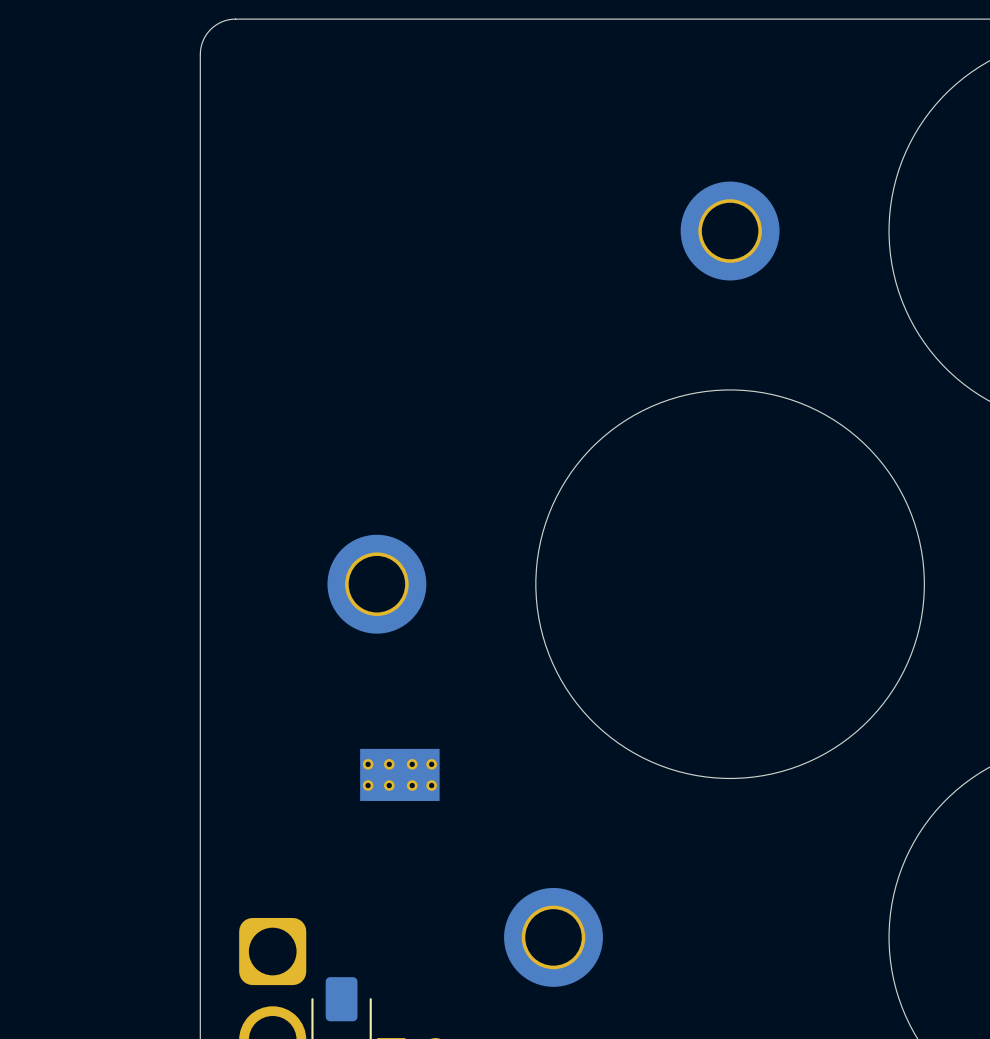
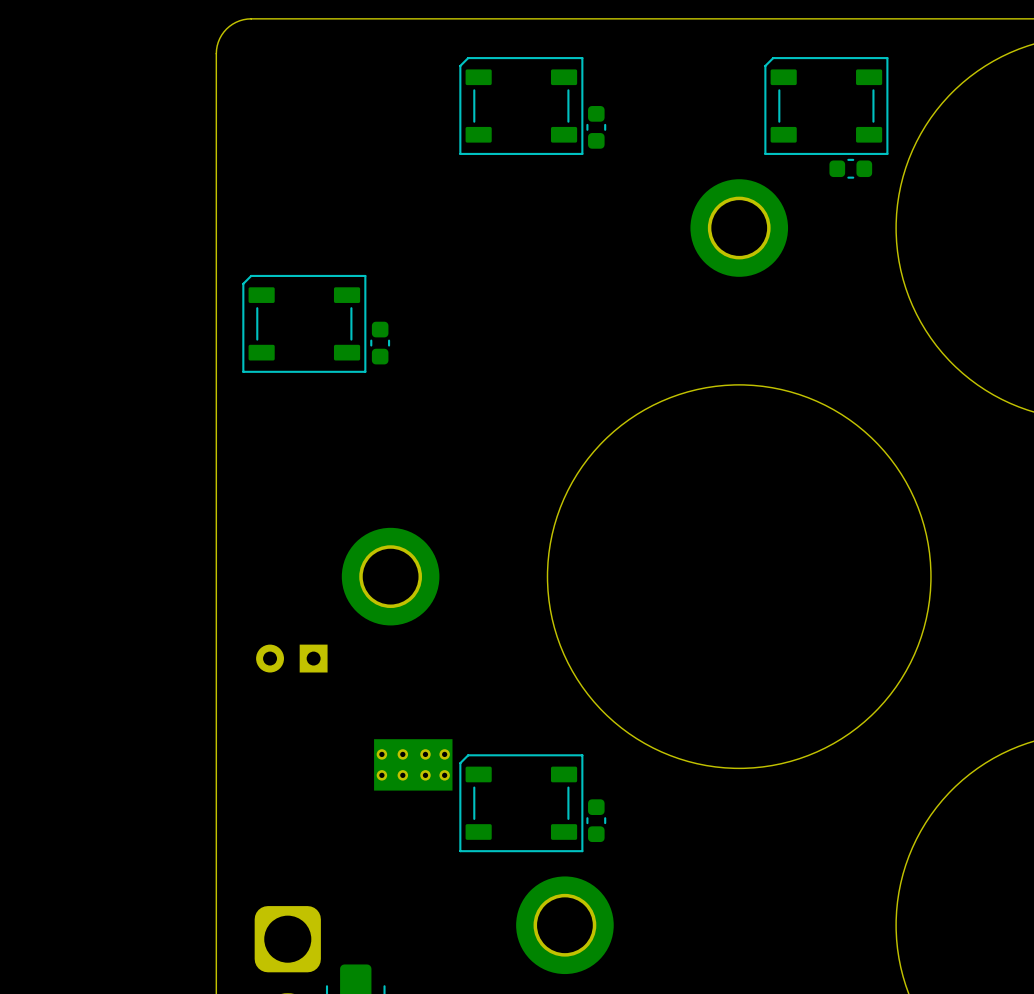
part: none -> (521, 106)
part: none -> (826, 106)
part: none -> (596, 127)
part: none -> (850, 168)
part: none -> (304, 323)
part: none -> (380, 343)
part: none -> (291, 658)
part: none -> (521, 803)
part: none -> (596, 820)

